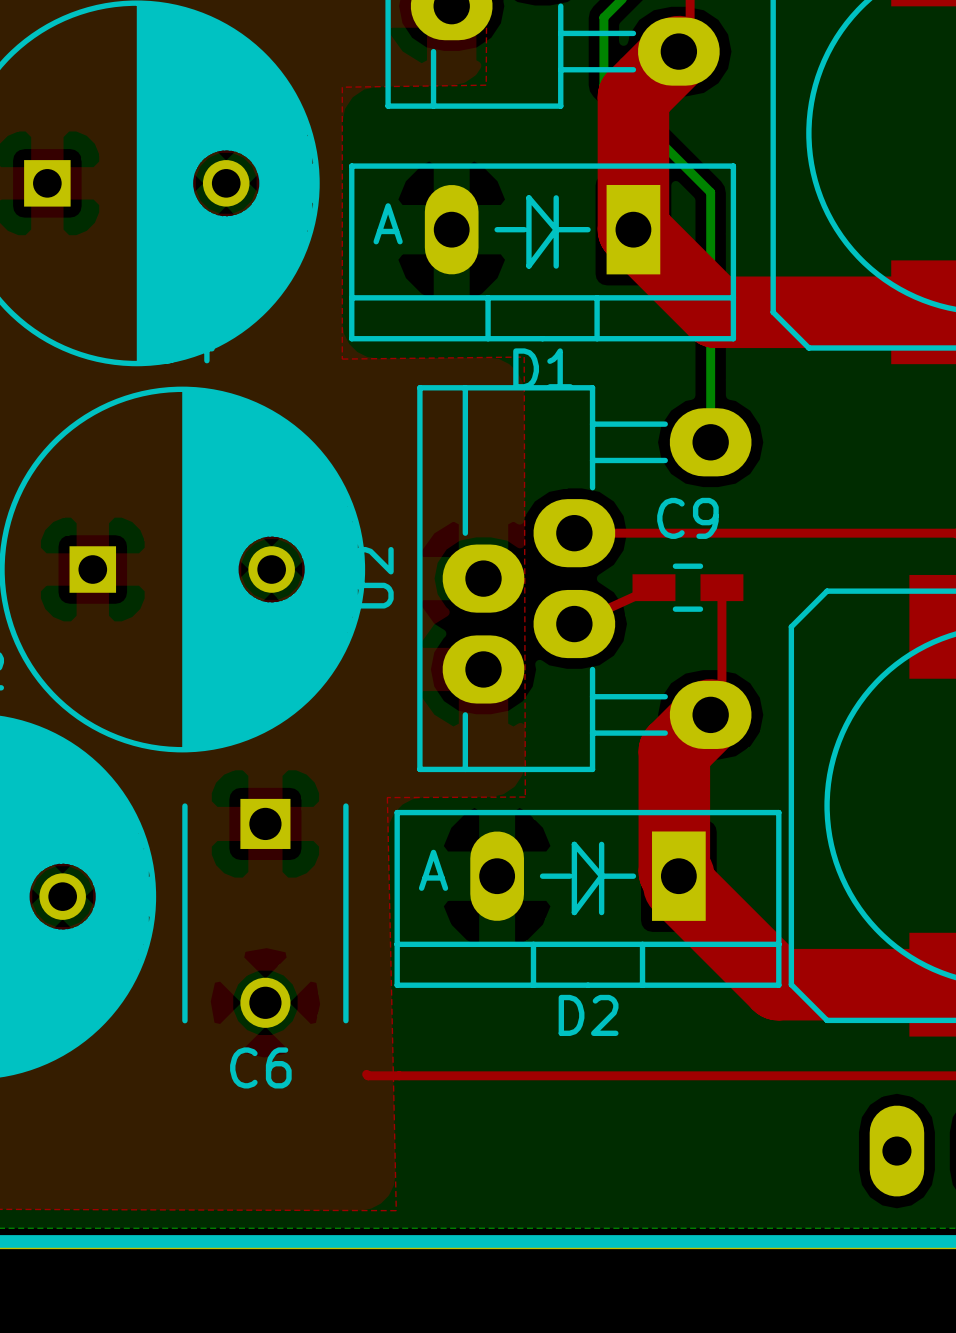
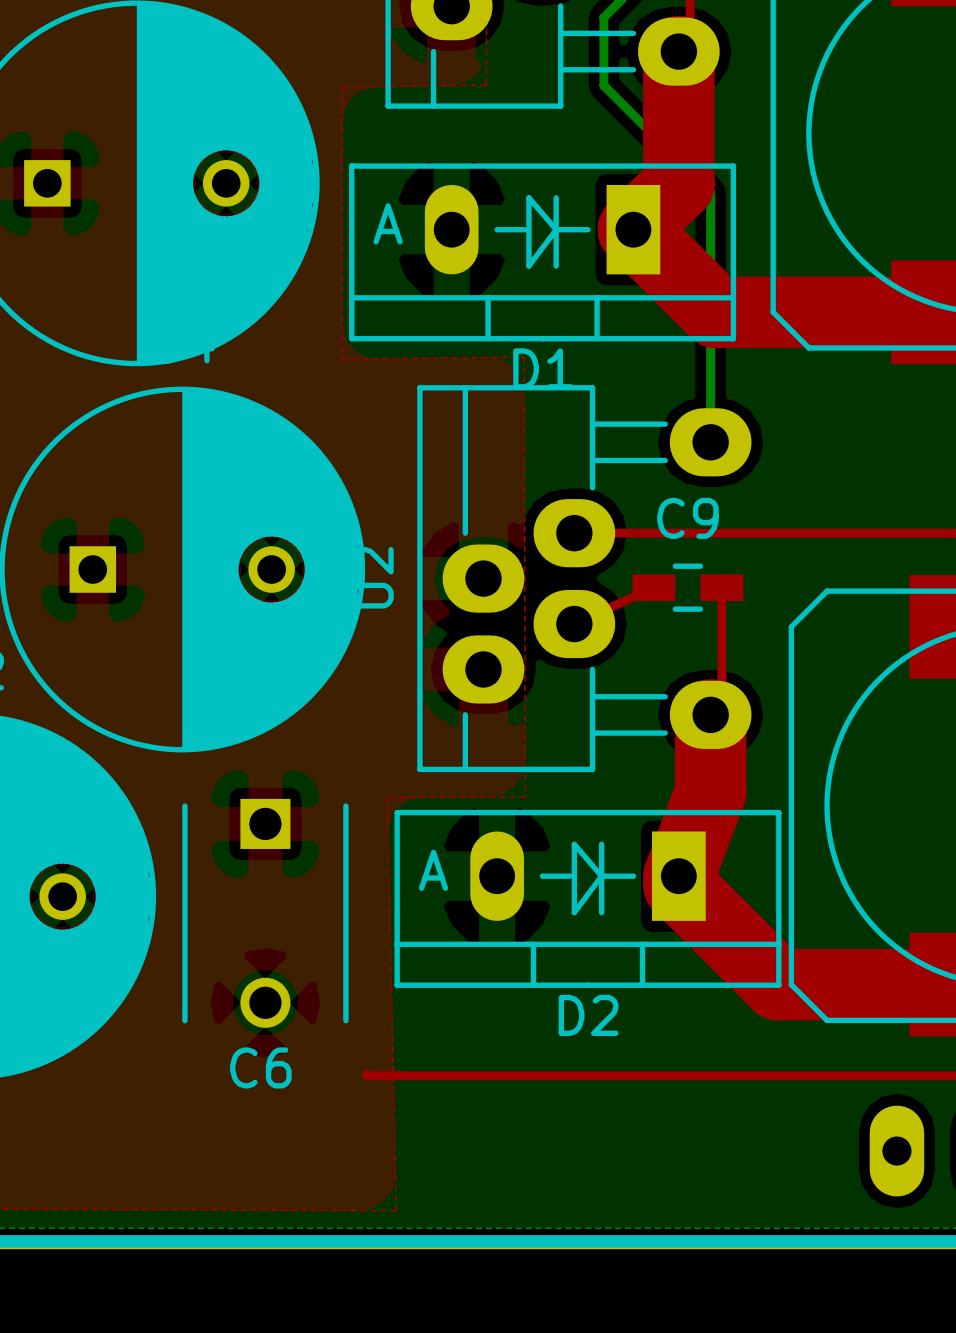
top track: (678, 51) (633, 97) (633, 229) -> (678, 51) (678, 184) (633, 229)
top track: (710, 714) (674, 751) (674, 871) (678, 876) -> (710, 714) (710, 792) (678, 876)

